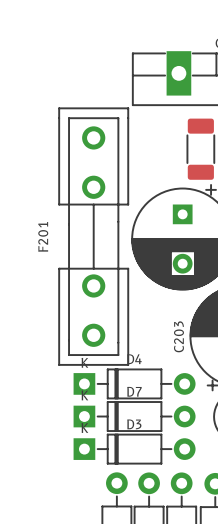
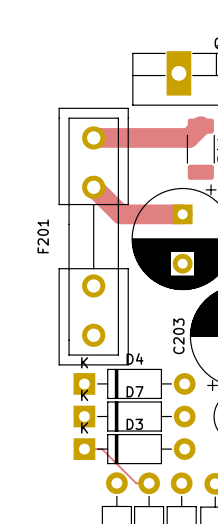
track: none -> (200, 126) (189, 137) (93, 137)
track: none -> (93, 187) (120, 214) (182, 214)
track: none -> (84, 449) (102, 449) (136, 483) (149, 483)

